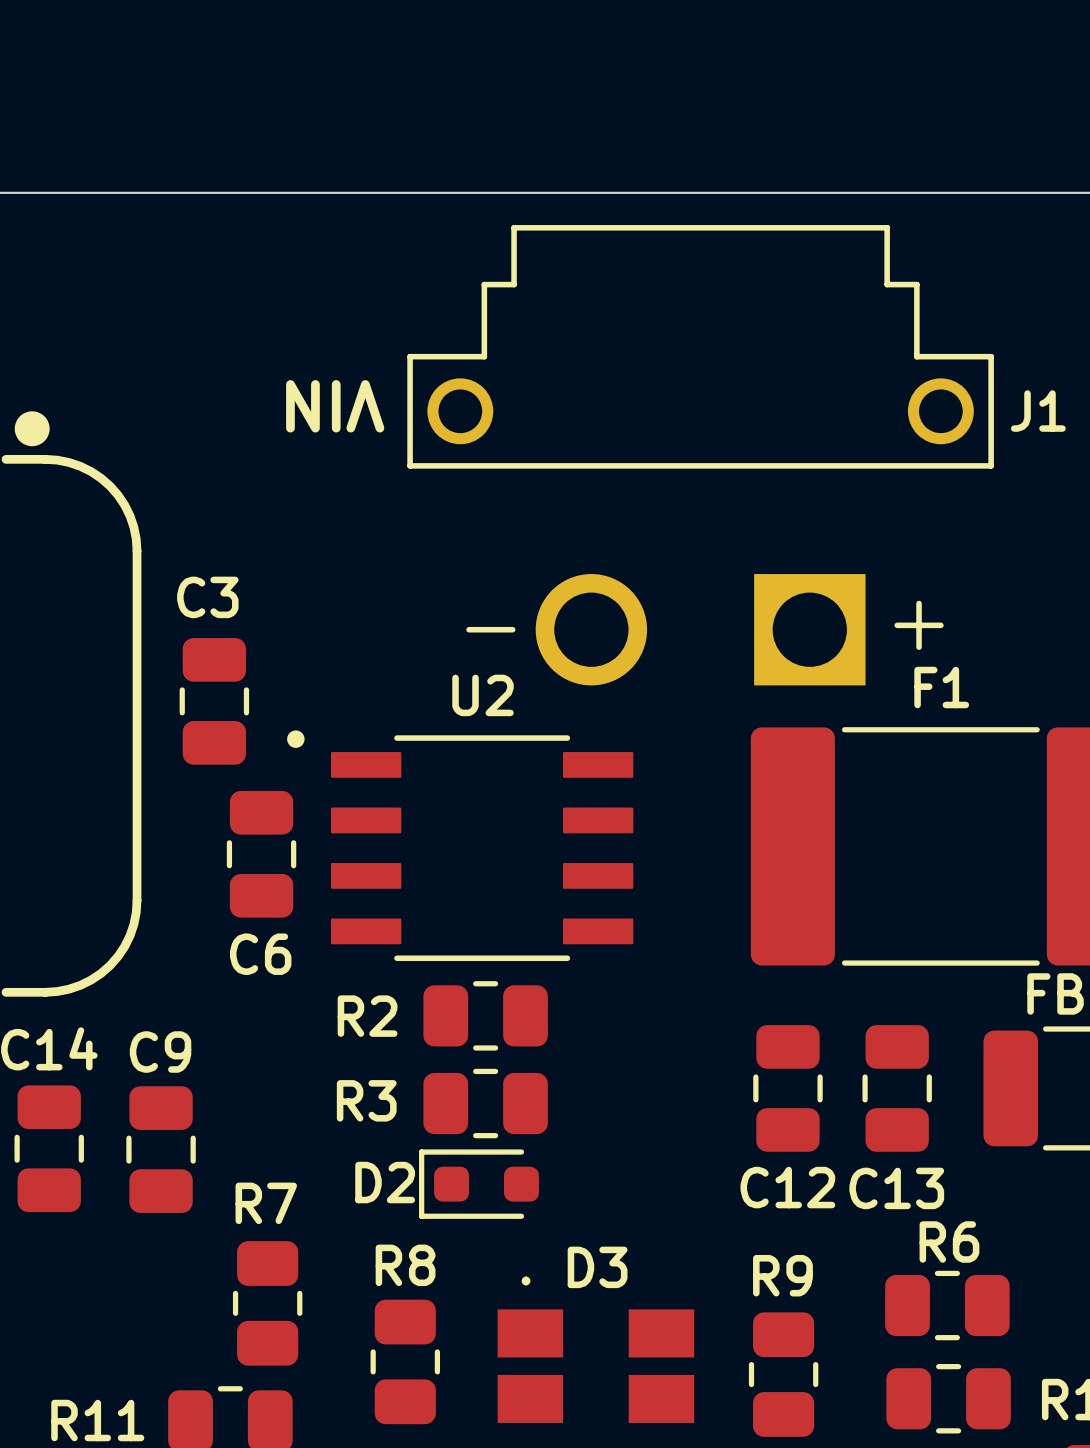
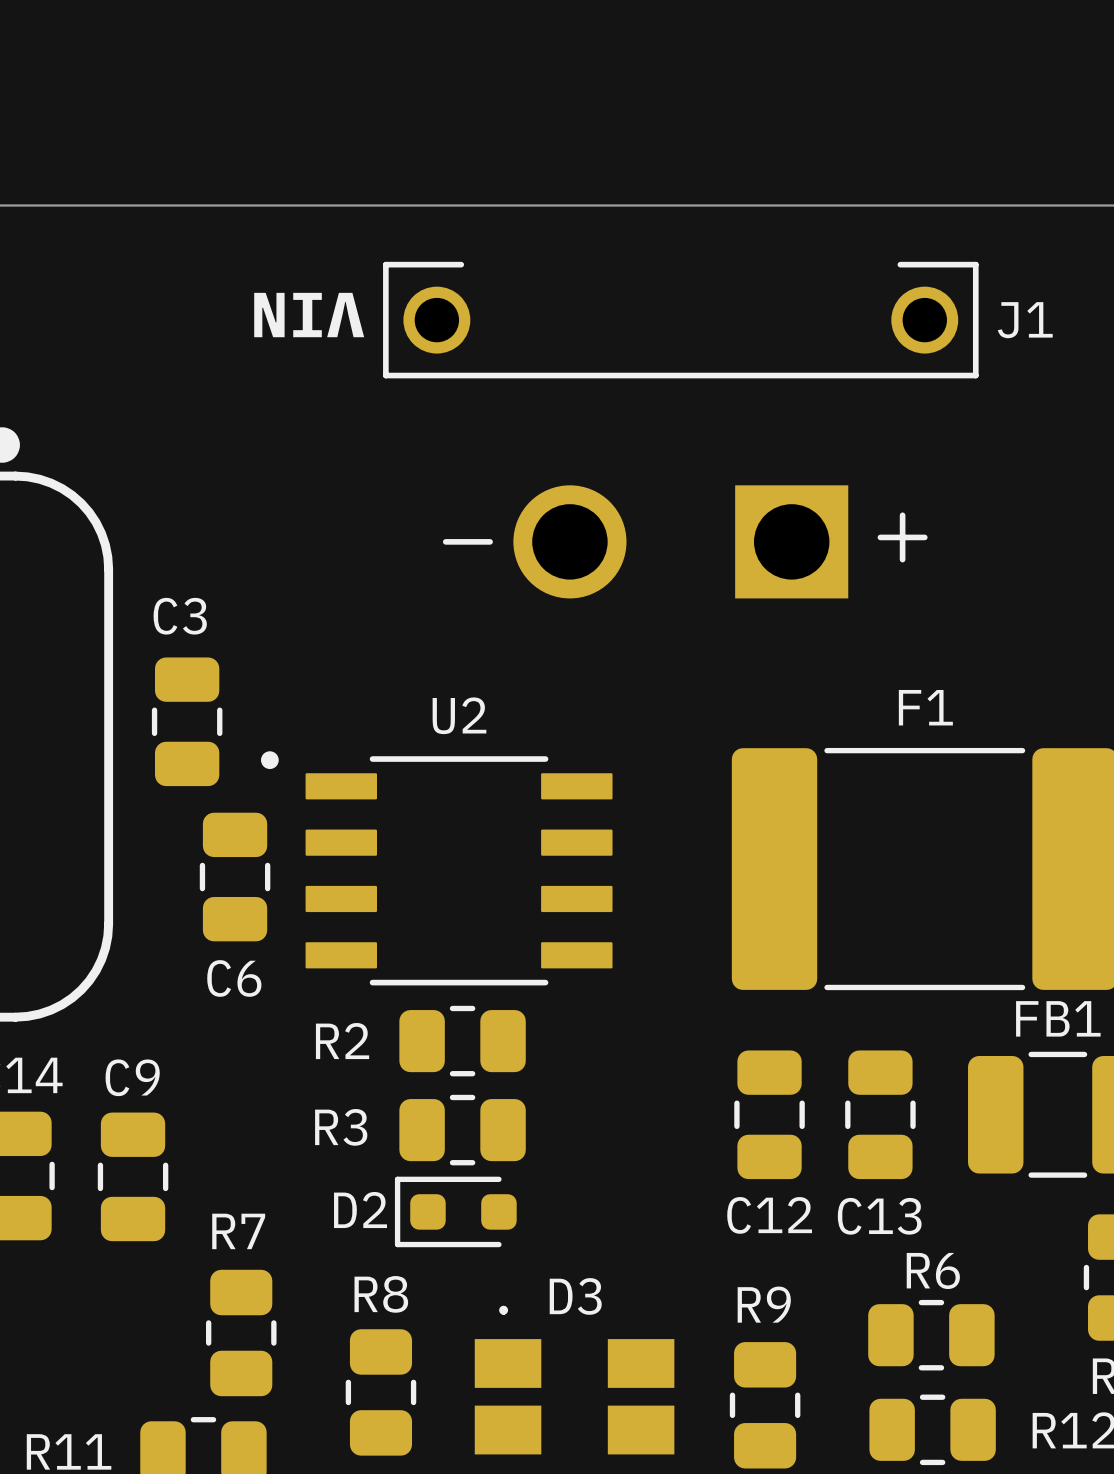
J1 footprint: [407, 225, 994, 686] -> [383, 261, 979, 599]
text position: VIN (335, 406) -> VIN (309, 315)

